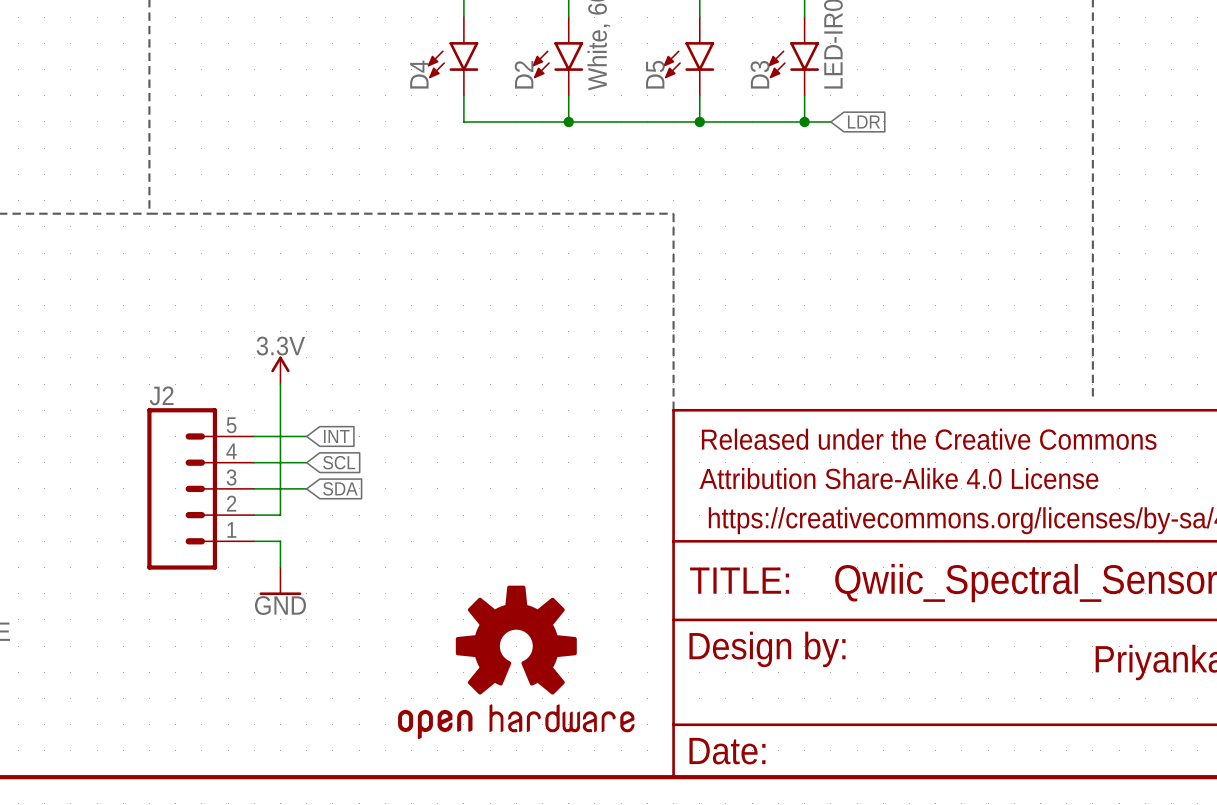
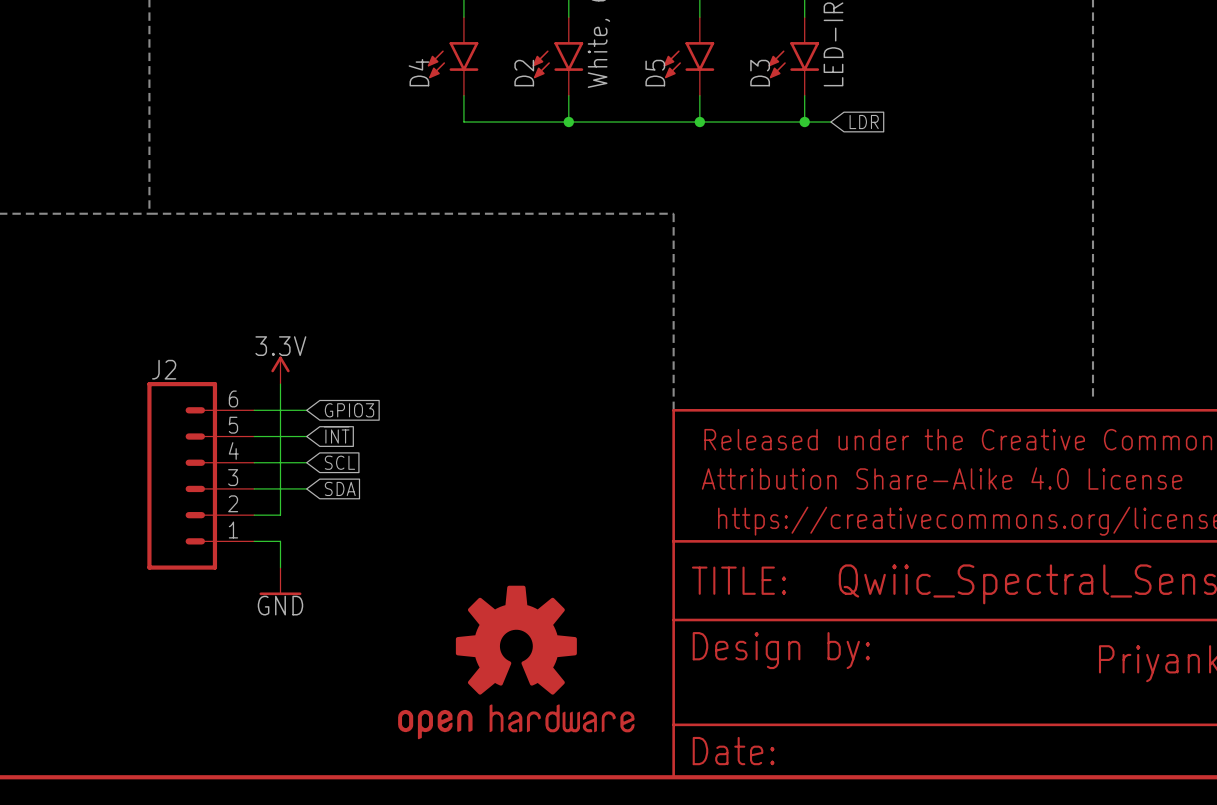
J2 symbol: [147, 408, 255, 570] -> [147, 382, 255, 570]
wire: none -> (254, 410) (306, 410)
global label: none -> GPIO3 (349, 410)
global label: INT (336, 436) -> ~{INT} (336, 435)

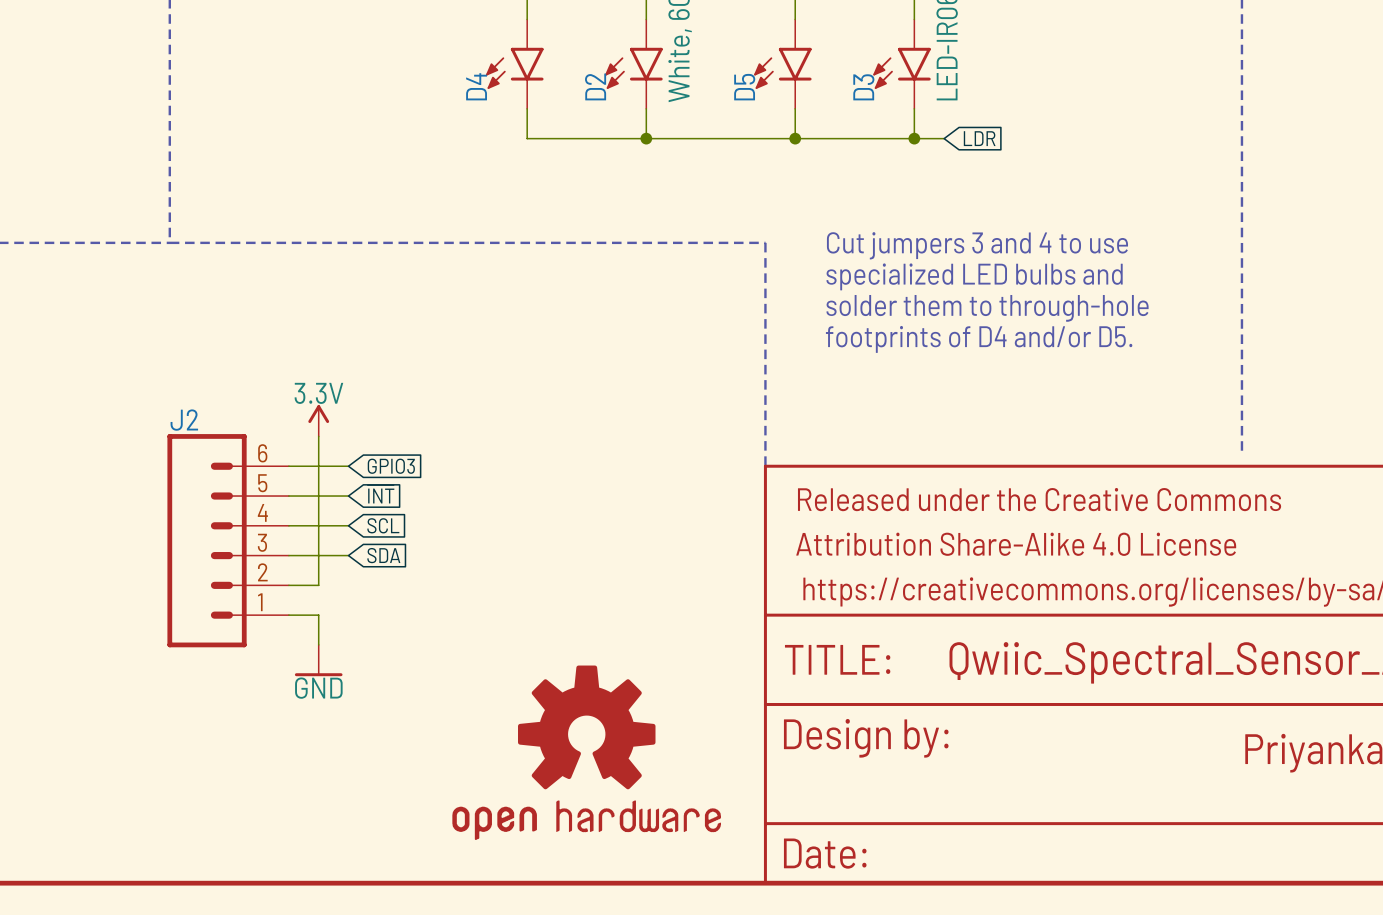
text: none -> Cut jumpers 3 and 4 to use (977, 245)
text: none -> specialized LED bulbs and (974, 276)
text: none -> solder them to through-hole (987, 308)
text: none -> footprints of D4 and/or D5. (979, 339)

